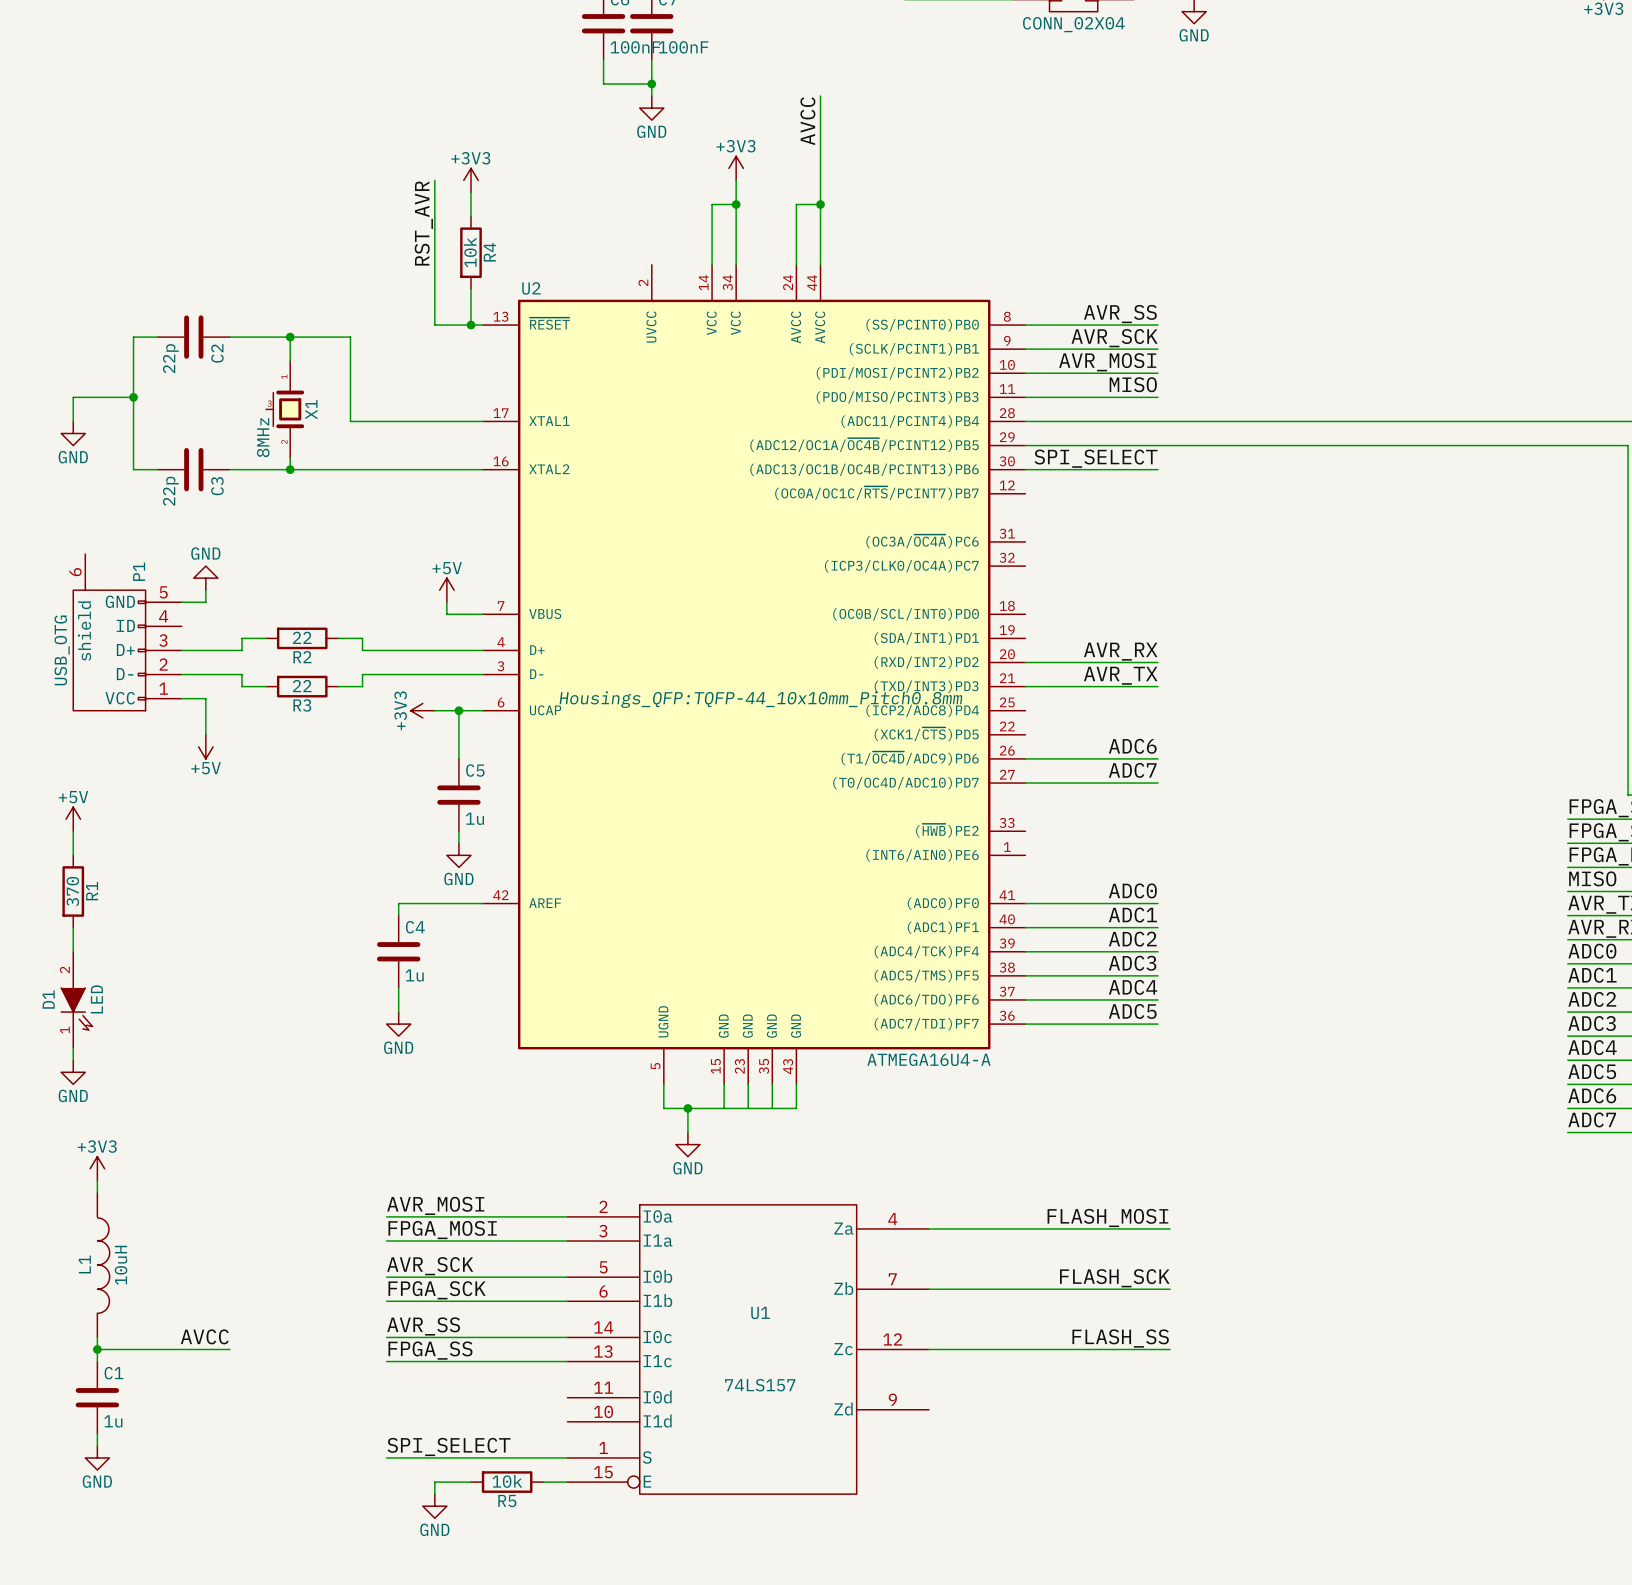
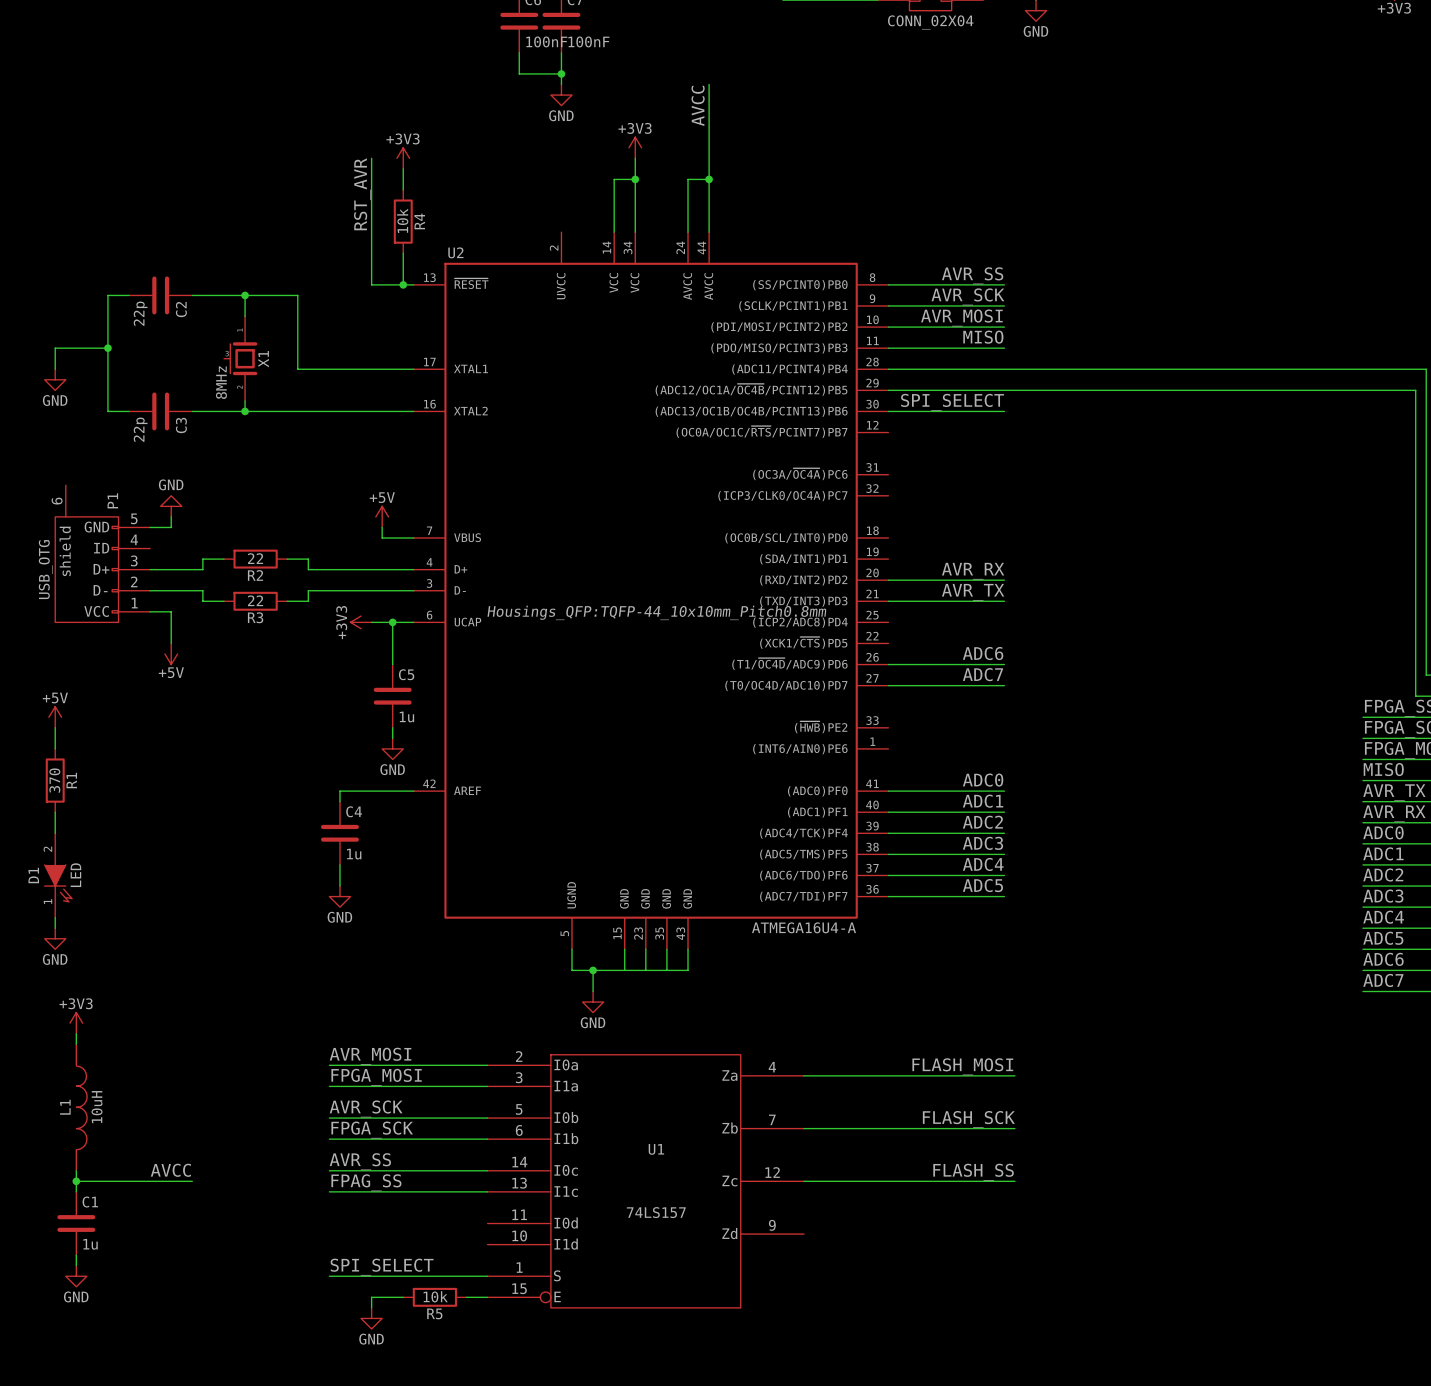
label: FPGA_SS (430, 1350) -> FPAG_SS (366, 1182)

